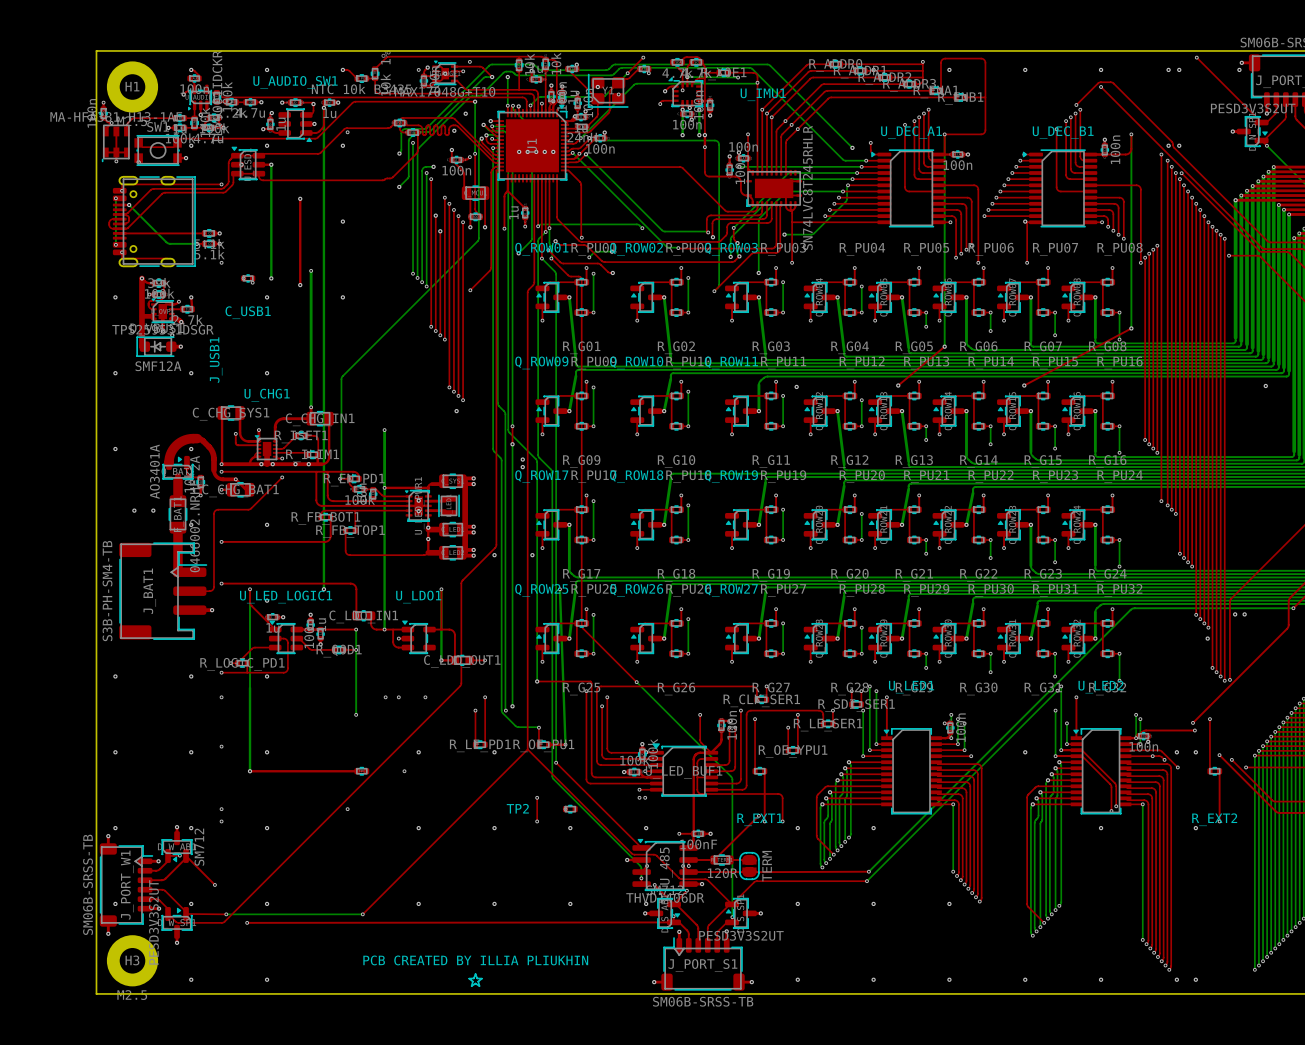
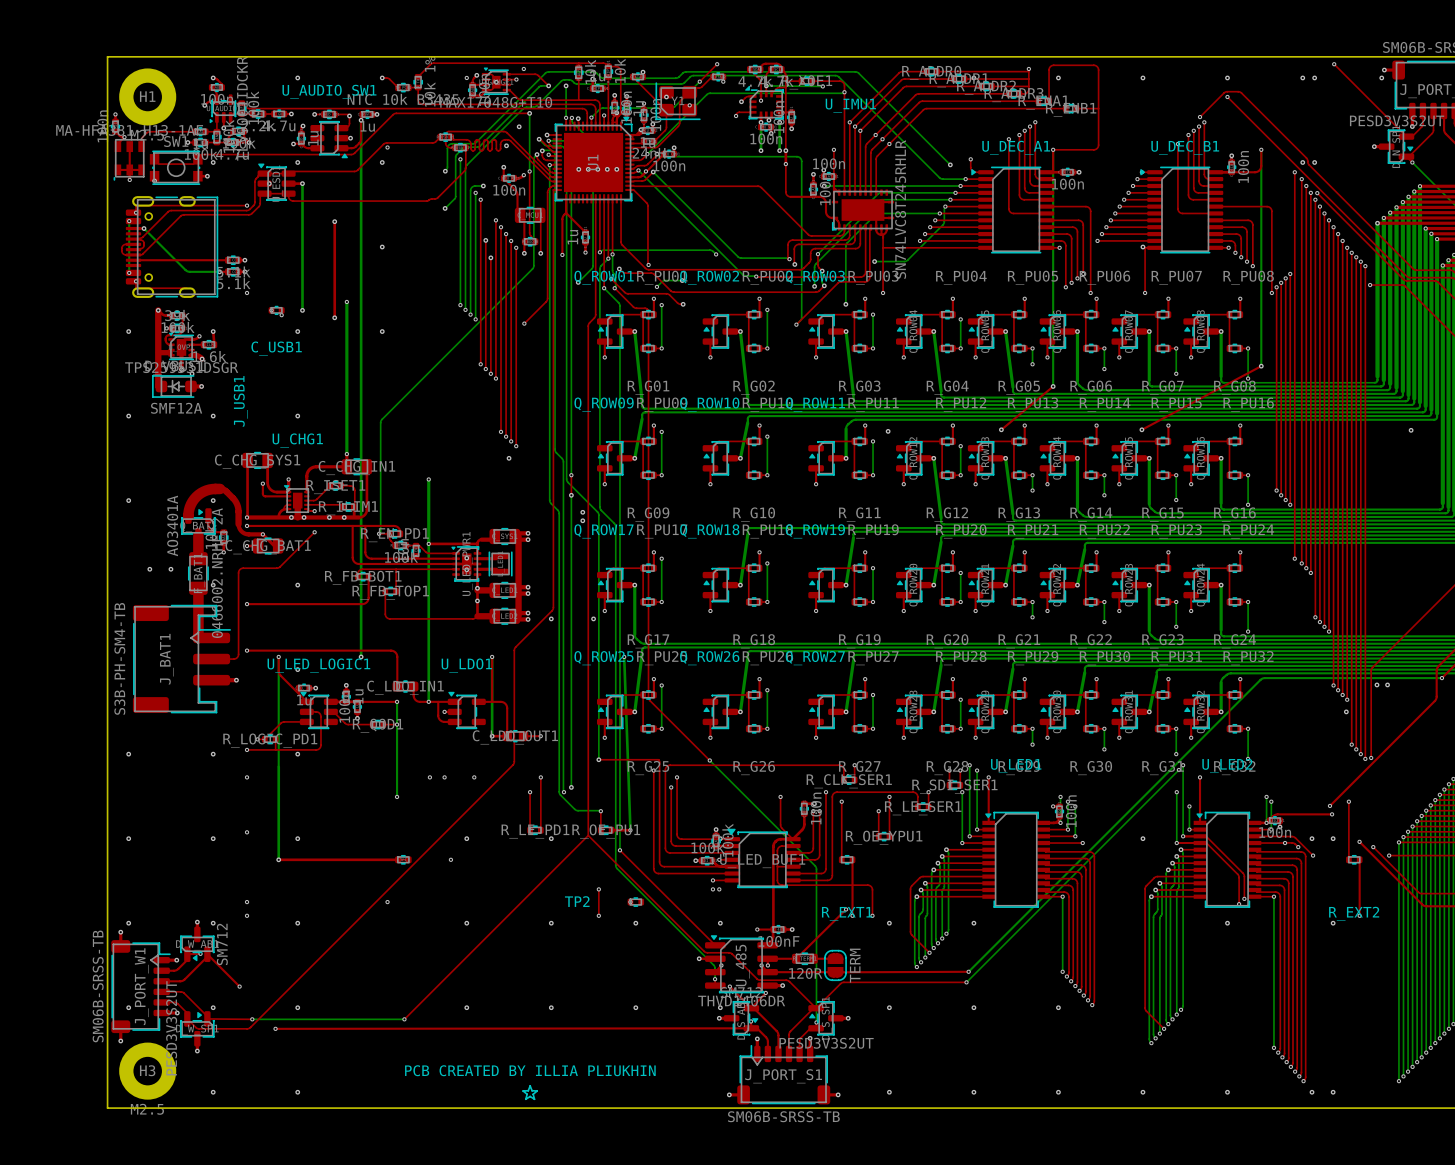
part value: 2.7k (187, 319) -> 1.6k (209, 356)

